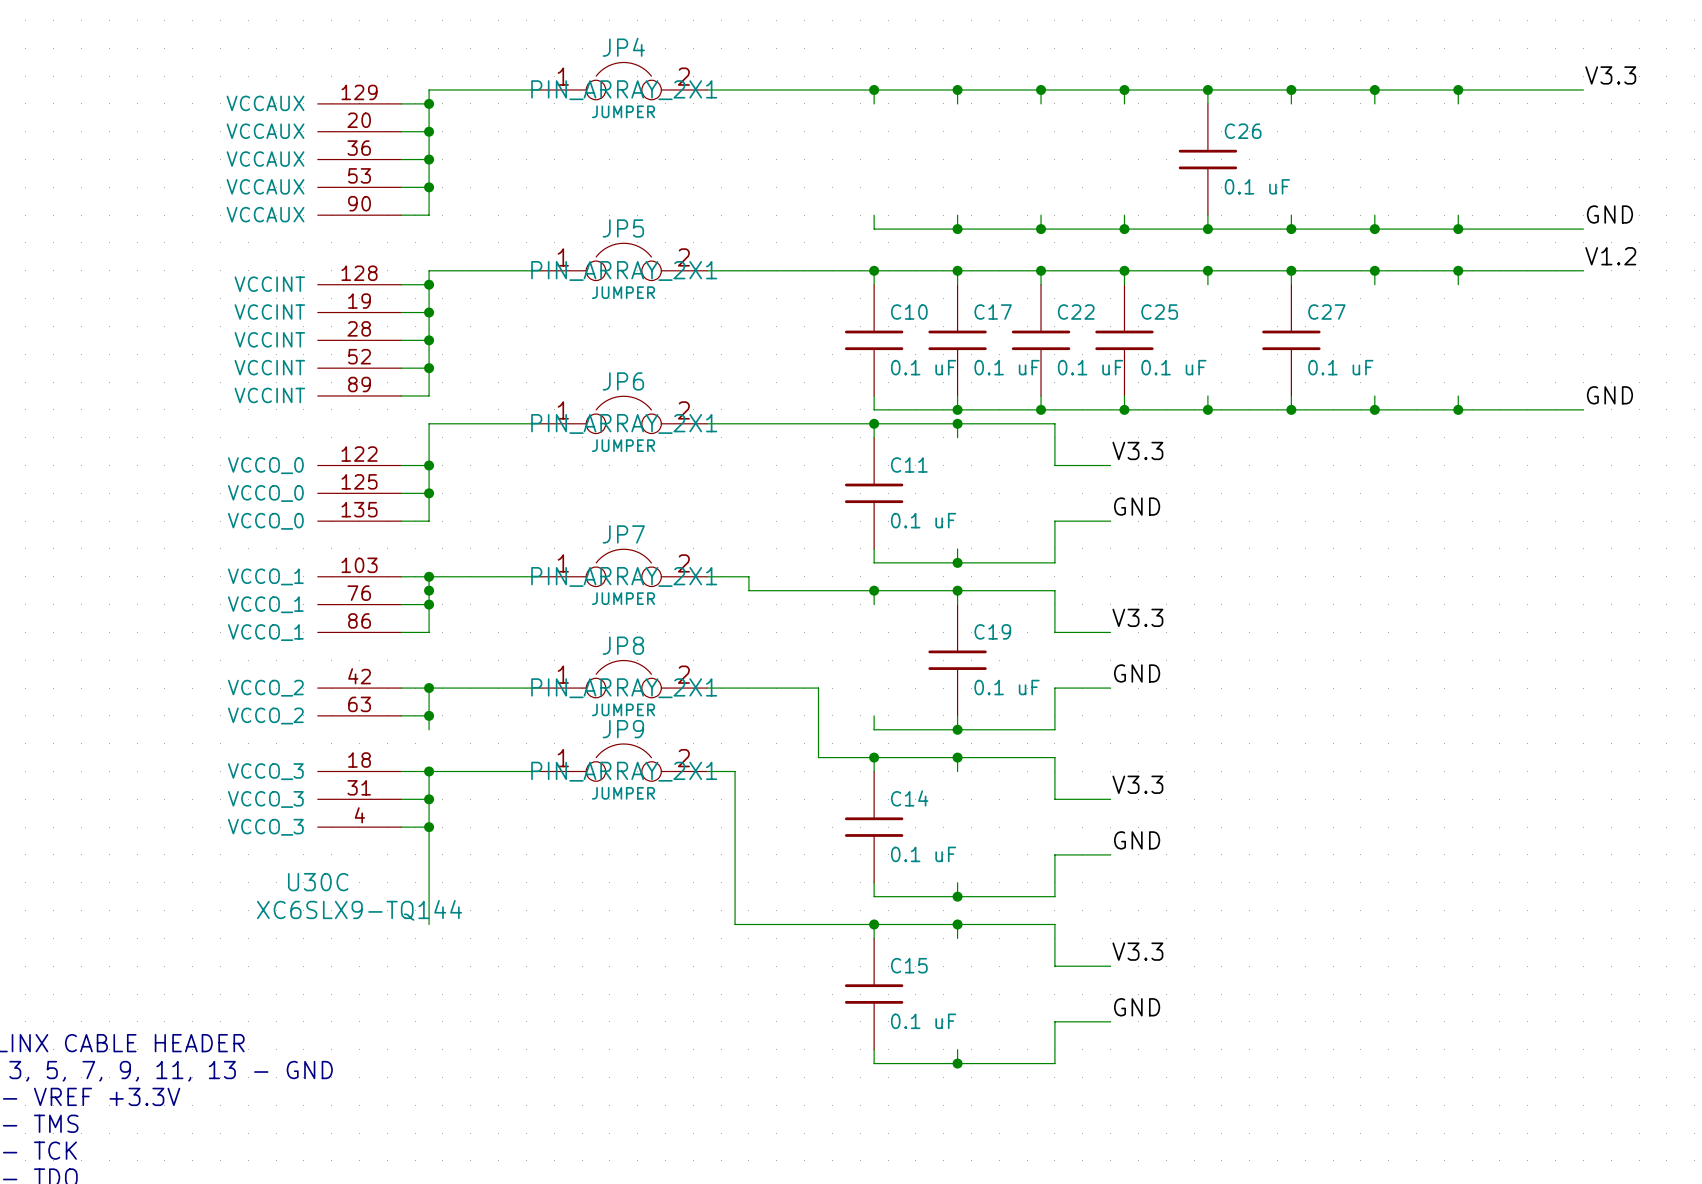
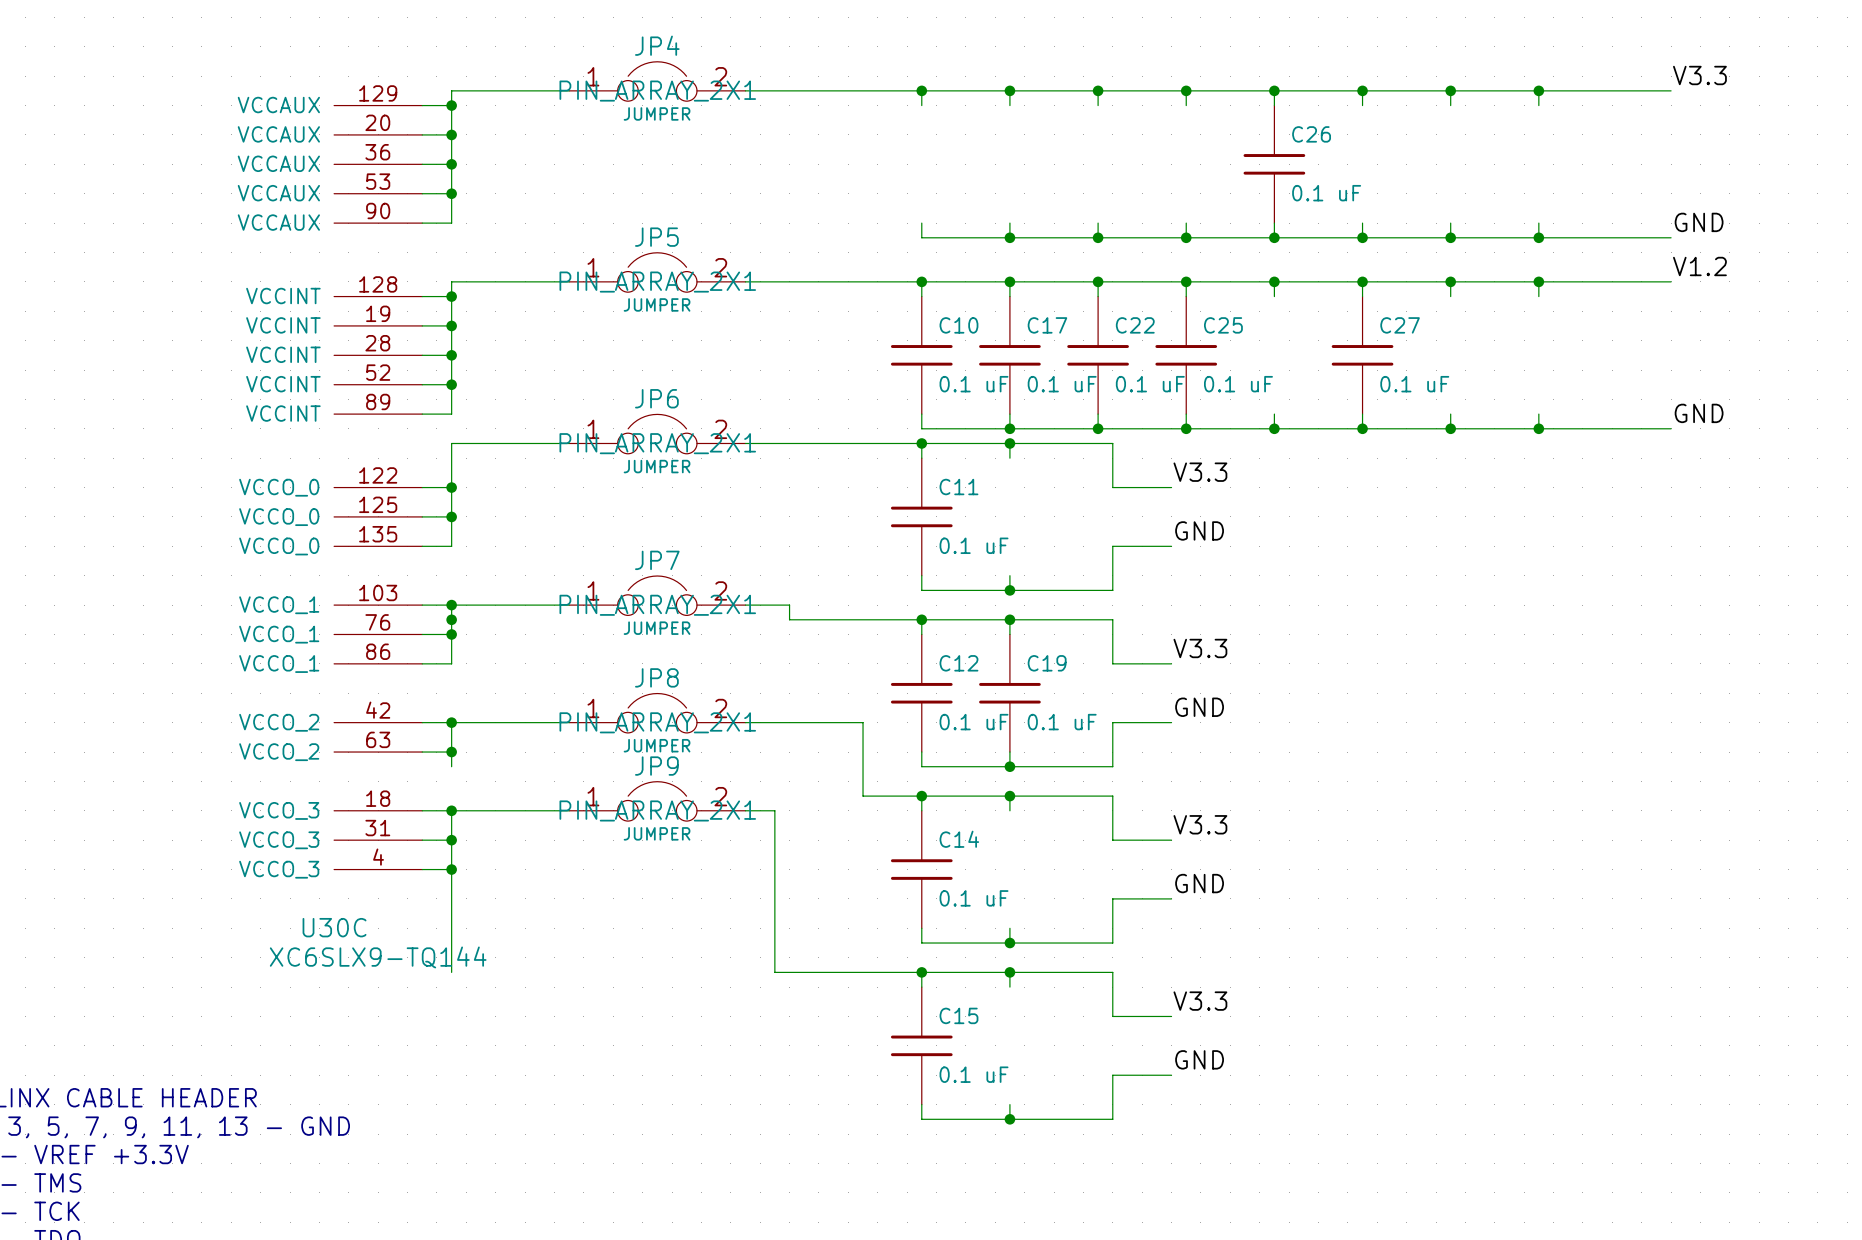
C12: none -> 0.1 uF (921, 693)

